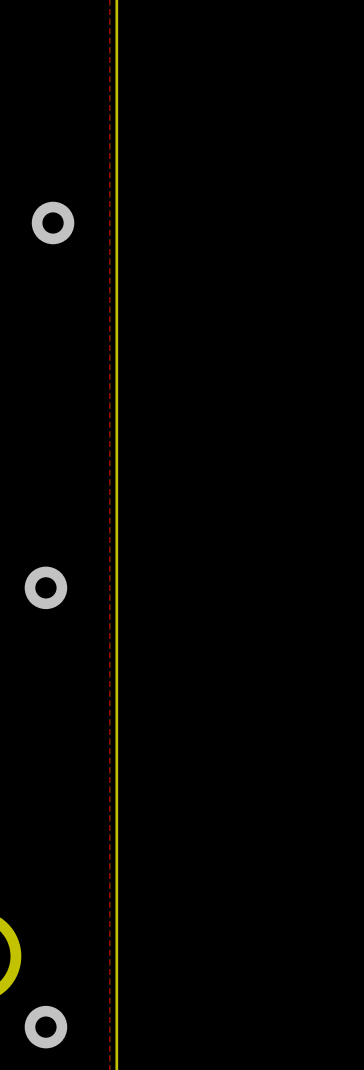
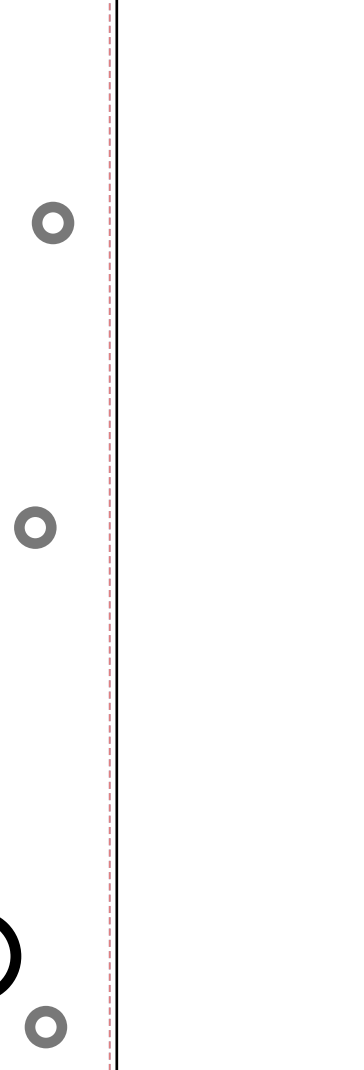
via position: (45, 587) -> (35, 527)

